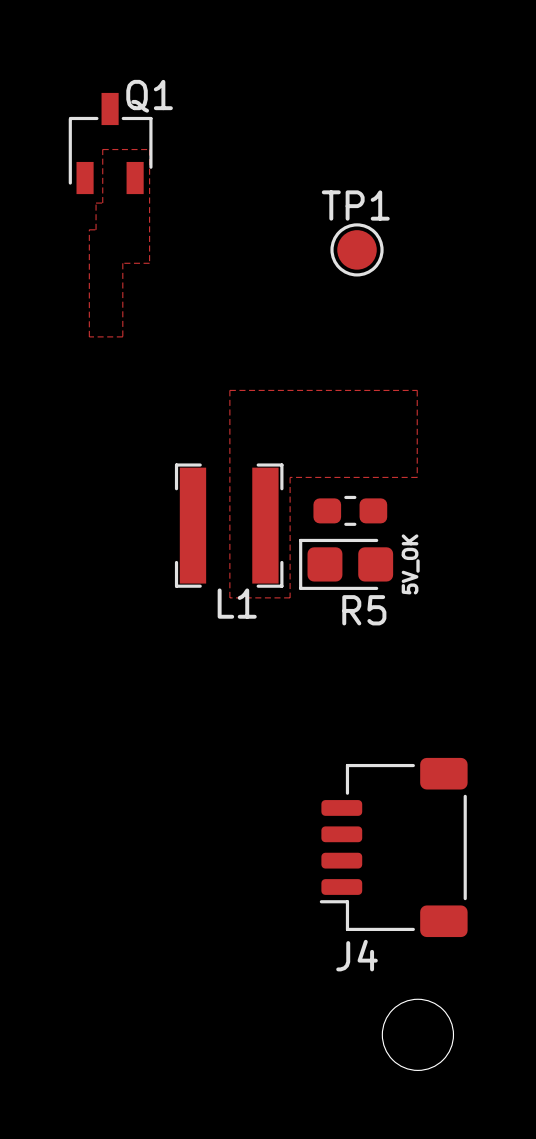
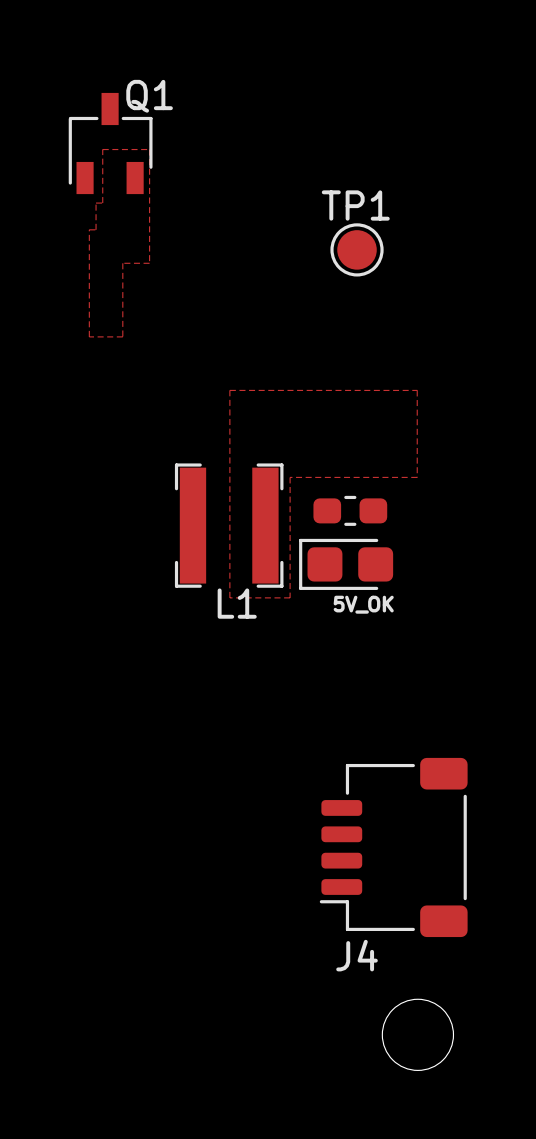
part value rotation: 0° (410, 564) -> 90° clockwise (363, 604)
R5 name: R5 (364, 610) -> none

